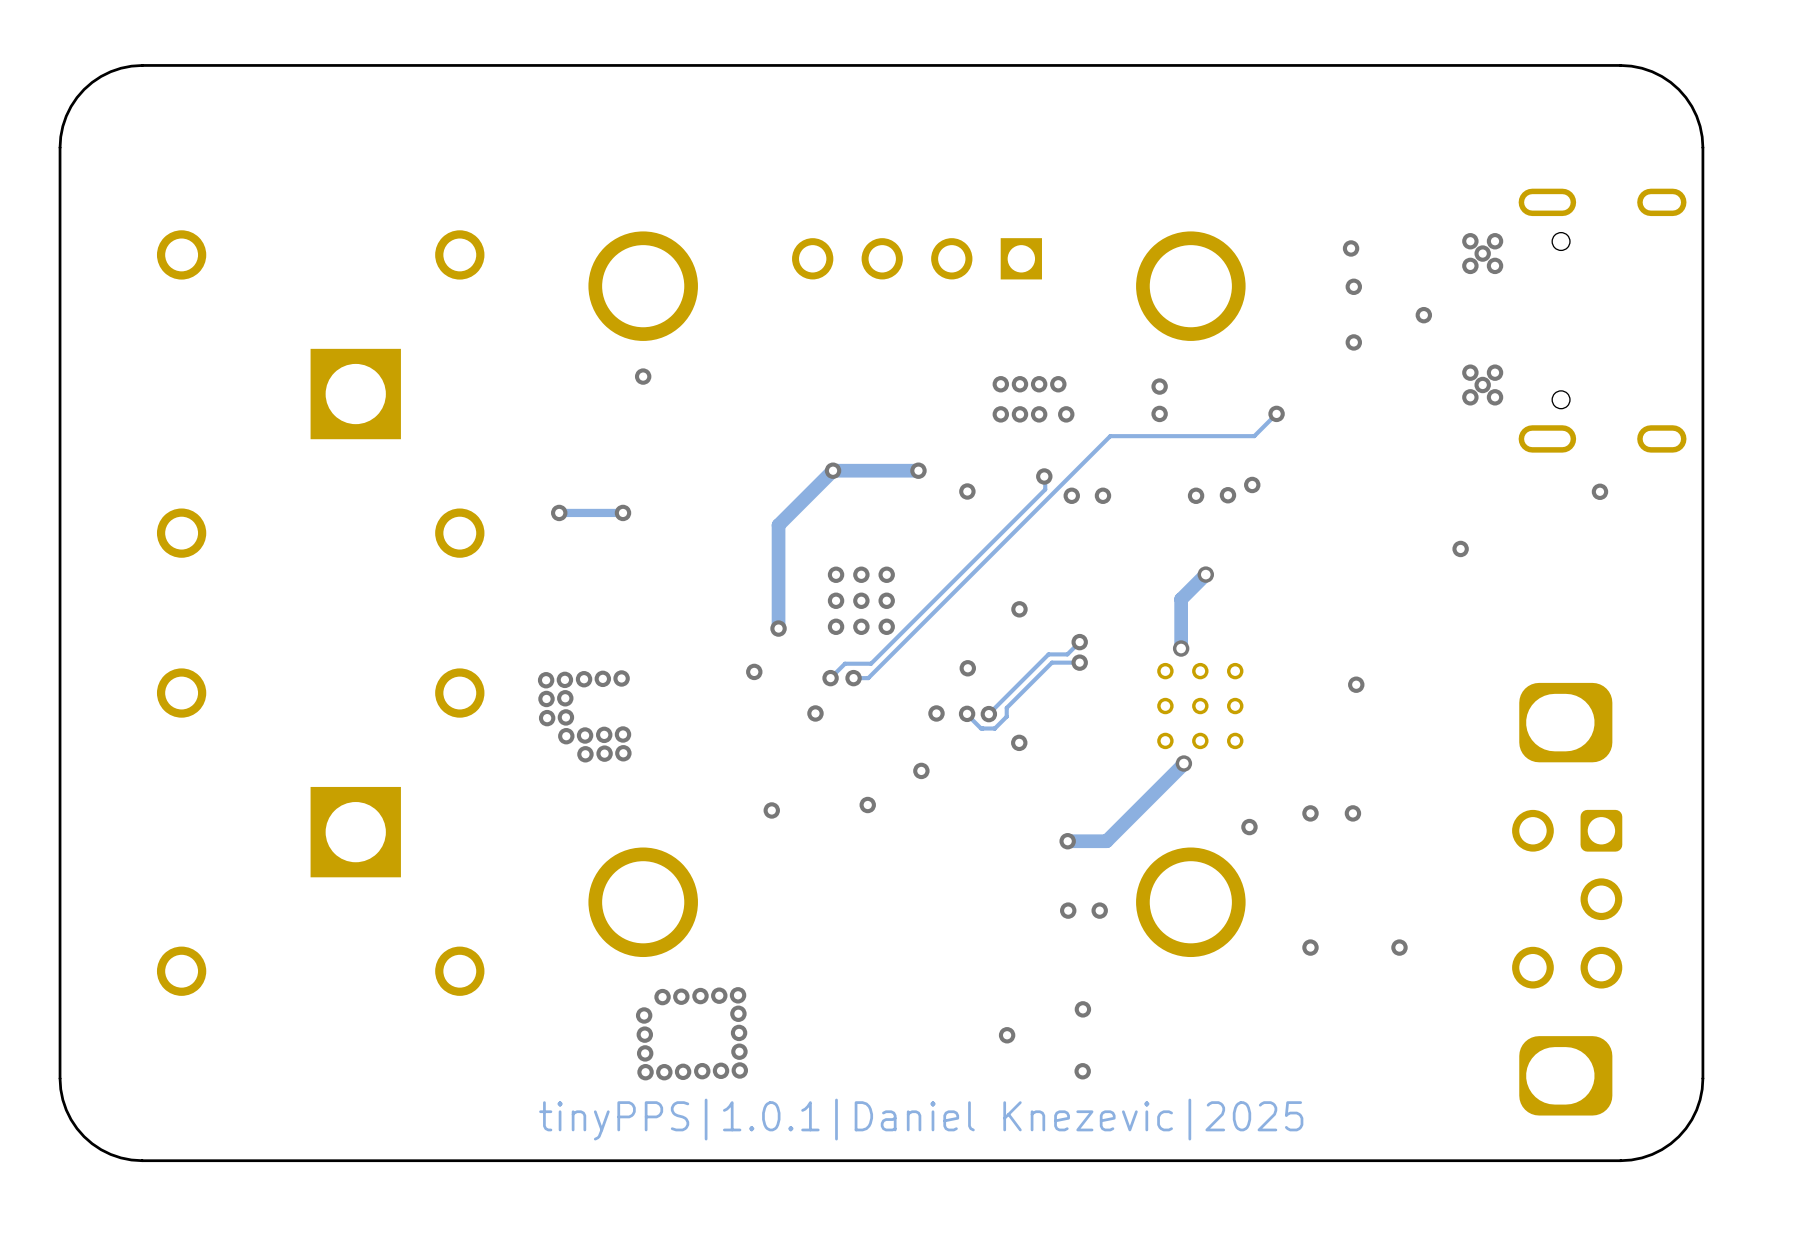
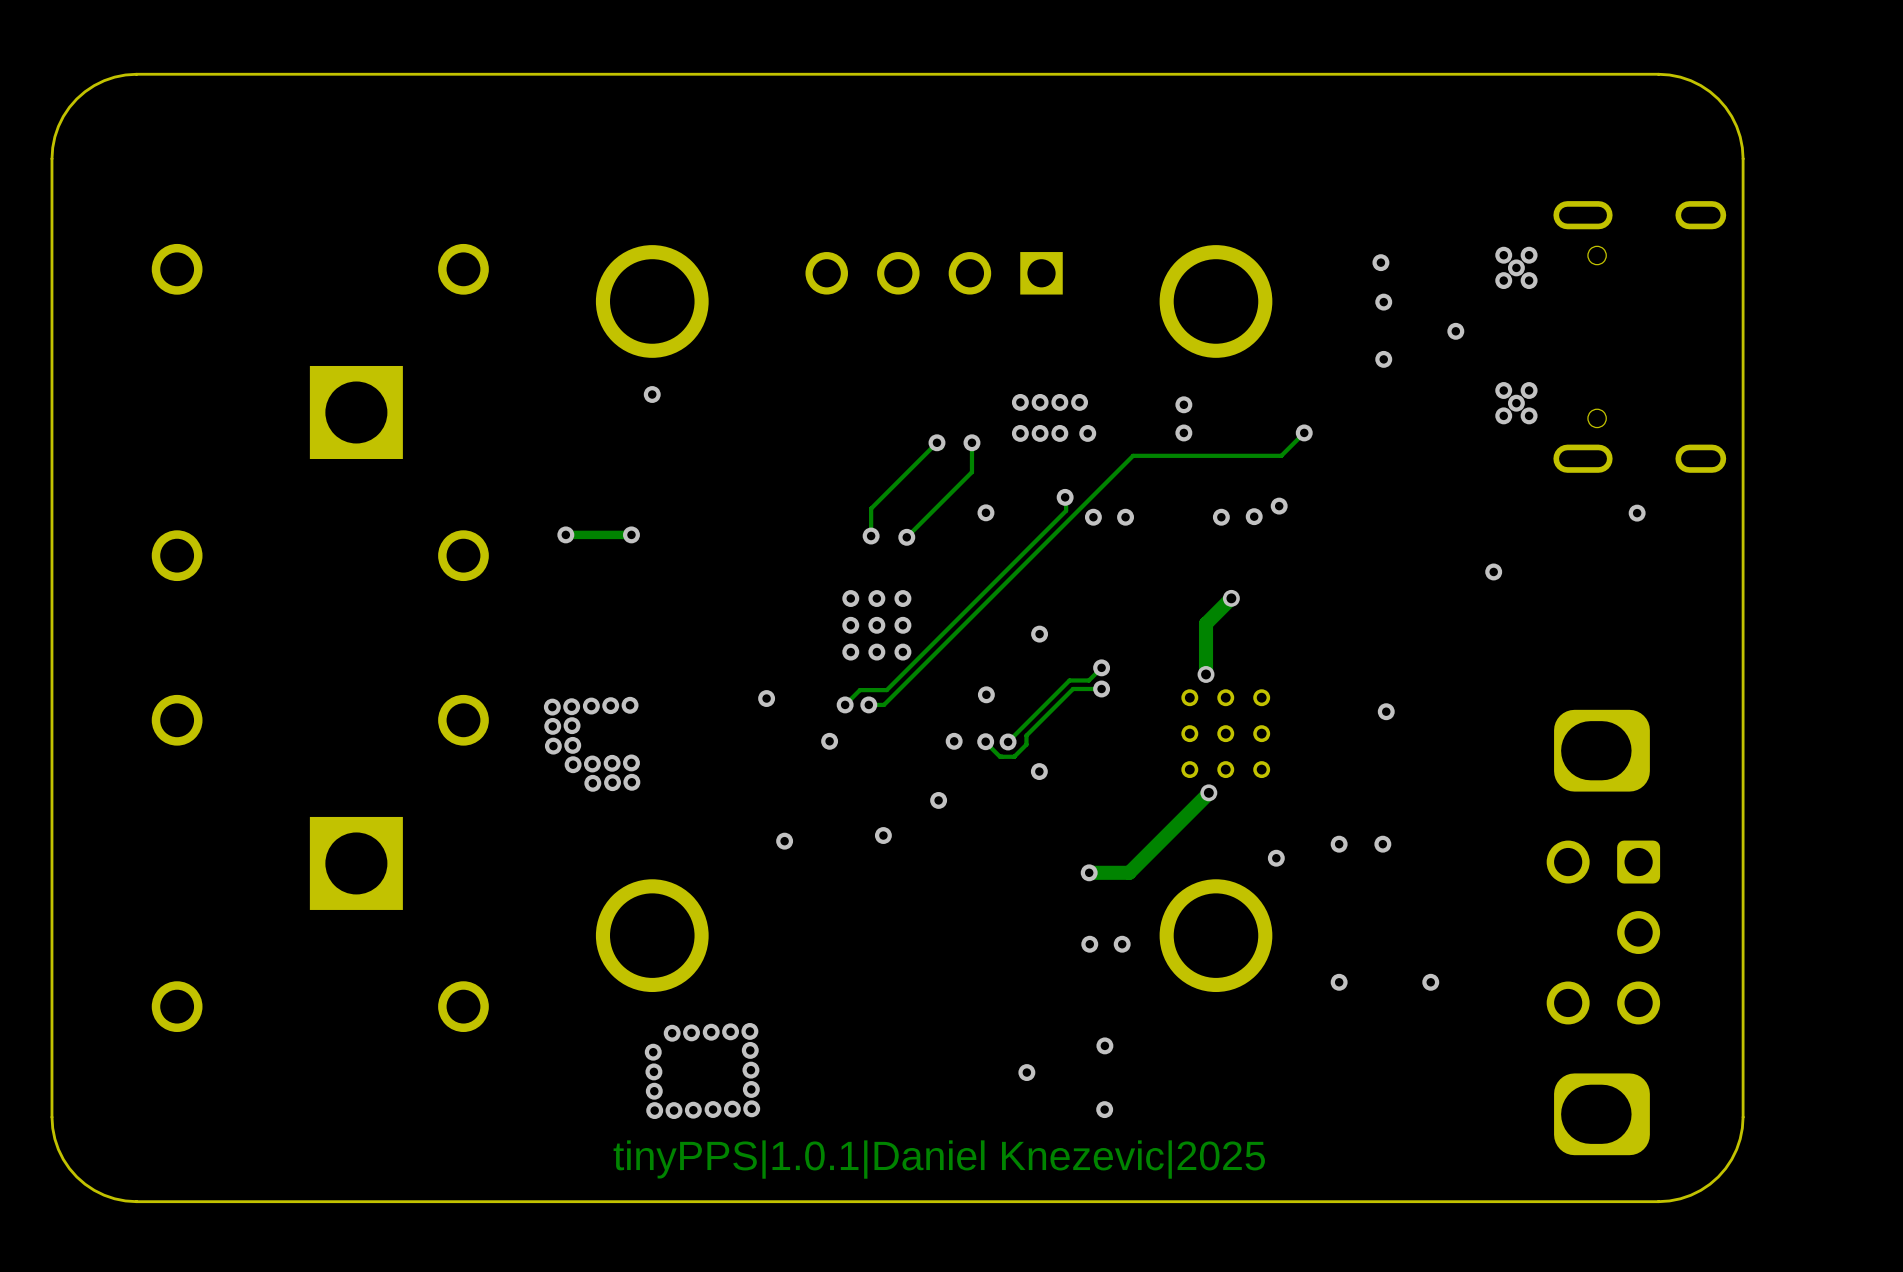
via: none -> (936, 442)
track: none -> (971, 442) (971, 472) (906, 537)
via: none -> (971, 442)
track: none -> (941, 447) (936, 442) (871, 508) (871, 536)
via: (833, 470) -> none
track: (918, 470) (833, 470) (778, 525) (778, 628) -> none
via: (918, 470) -> none
via: none -> (871, 536)
via: none -> (906, 537)
via: (778, 628) -> none

